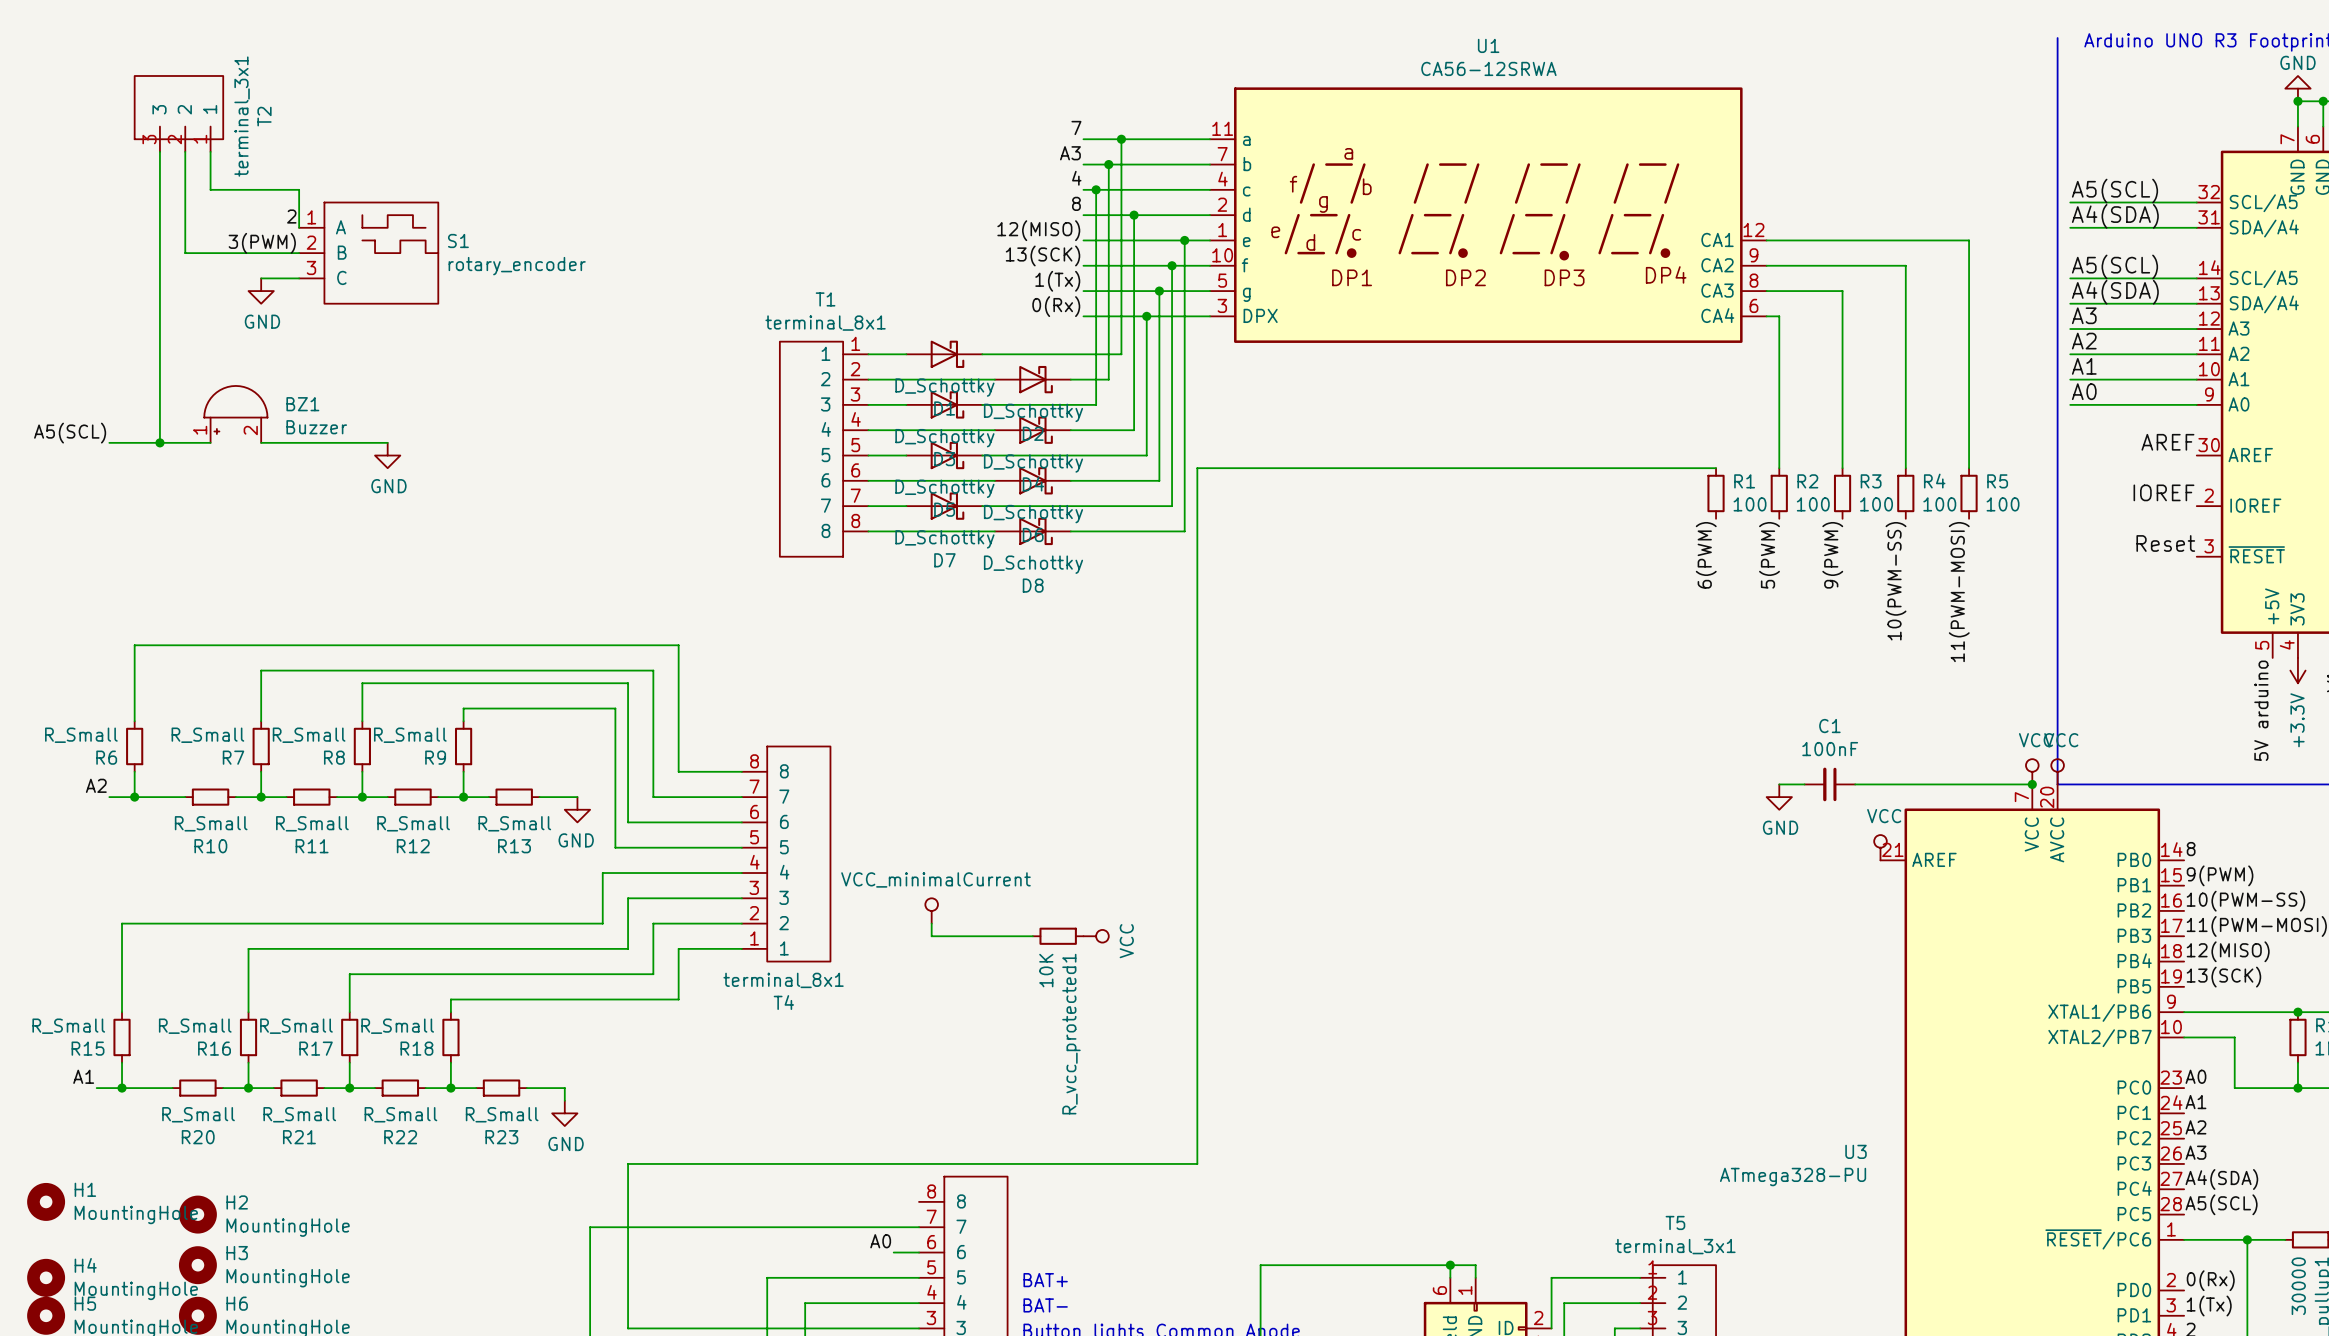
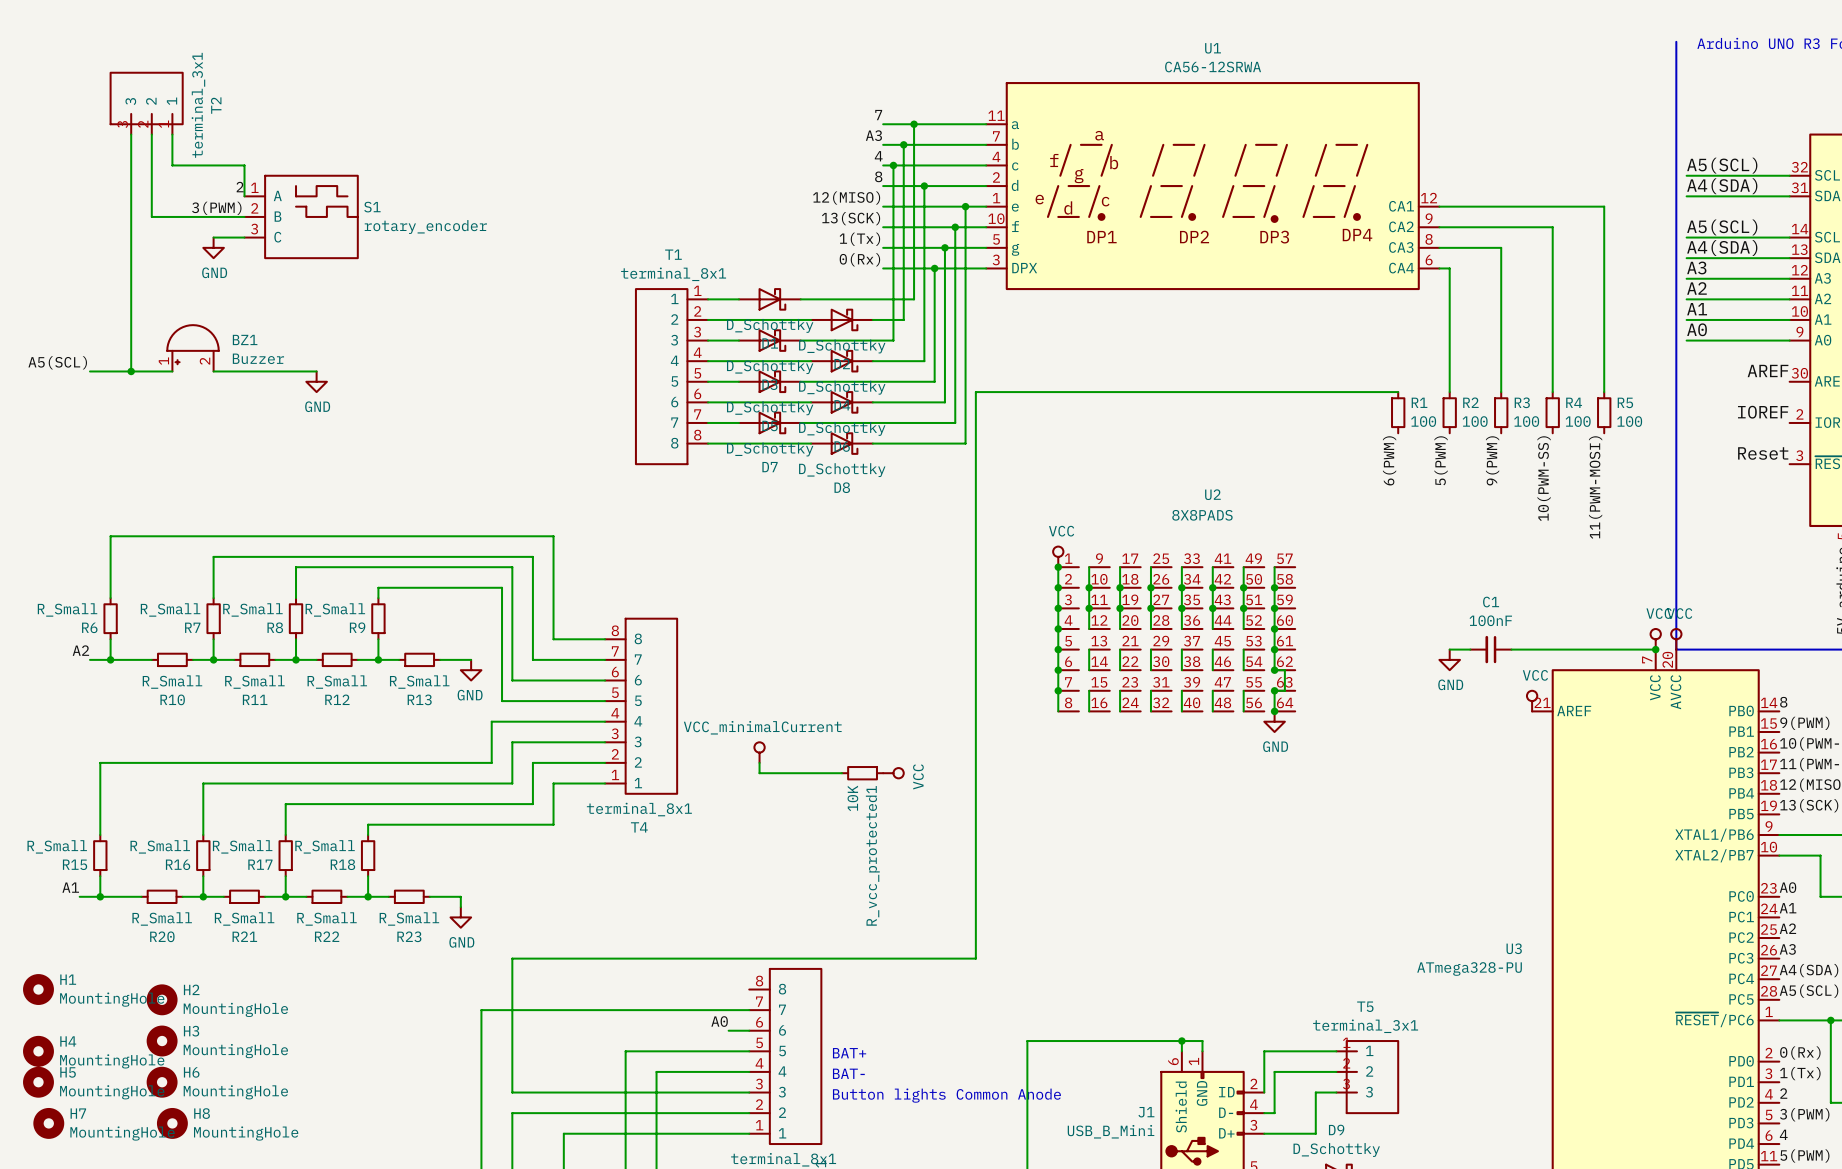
power symbol: none -> VCC (1058, 556)
wire: none -> (1058, 567) (1058, 711)
junction: none -> (1058, 567)
wire: none -> (1089, 567) (1089, 628)
wire: none -> (1120, 567) (1120, 628)
wire: none -> (1150, 567) (1150, 628)
wire: none -> (1181, 567) (1181, 628)
wire: none -> (1212, 567) (1212, 628)
wire: none -> (1243, 567) (1243, 628)
wire: none -> (1274, 567) (1274, 670) (1284, 670) (1284, 690) (1274, 690) (1274, 711)
junction: none -> (1058, 587)
junction: none -> (1089, 587)
junction: none -> (1120, 587)
junction: none -> (1150, 587)
junction: none -> (1181, 587)
junction: none -> (1212, 587)
junction: none -> (1243, 587)
junction: none -> (1274, 587)
junction: none -> (1058, 608)
junction: none -> (1089, 608)
junction: none -> (1120, 608)
junction: none -> (1150, 608)
junction: none -> (1181, 608)
junction: none -> (1212, 608)
junction: none -> (1243, 608)
junction: none -> (1274, 608)
junction: none -> (1058, 628)
junction: none -> (1274, 628)
U2: none -> 8X8PADS (1176, 639)
junction: none -> (1058, 649)
wire: none -> (1089, 649) (1089, 670)
wire: none -> (1120, 649) (1120, 670)
wire: none -> (1150, 649) (1150, 670)
wire: none -> (1181, 649) (1181, 670)
wire: none -> (1212, 649) (1212, 670)
wire: none -> (1243, 649) (1243, 670)
junction: none -> (1274, 649)
junction: none -> (1058, 670)
junction: none -> (1274, 670)
junction: none -> (1058, 690)
wire: none -> (1089, 690) (1089, 711)
wire: none -> (1120, 690) (1120, 711)
wire: none -> (1150, 690) (1150, 711)
wire: none -> (1181, 690) (1181, 711)
wire: none -> (1212, 690) (1212, 711)
wire: none -> (1243, 690) (1243, 711)
junction: none -> (1274, 690)
junction: none -> (1274, 711)
power symbol: none -> GND (1274, 721)

